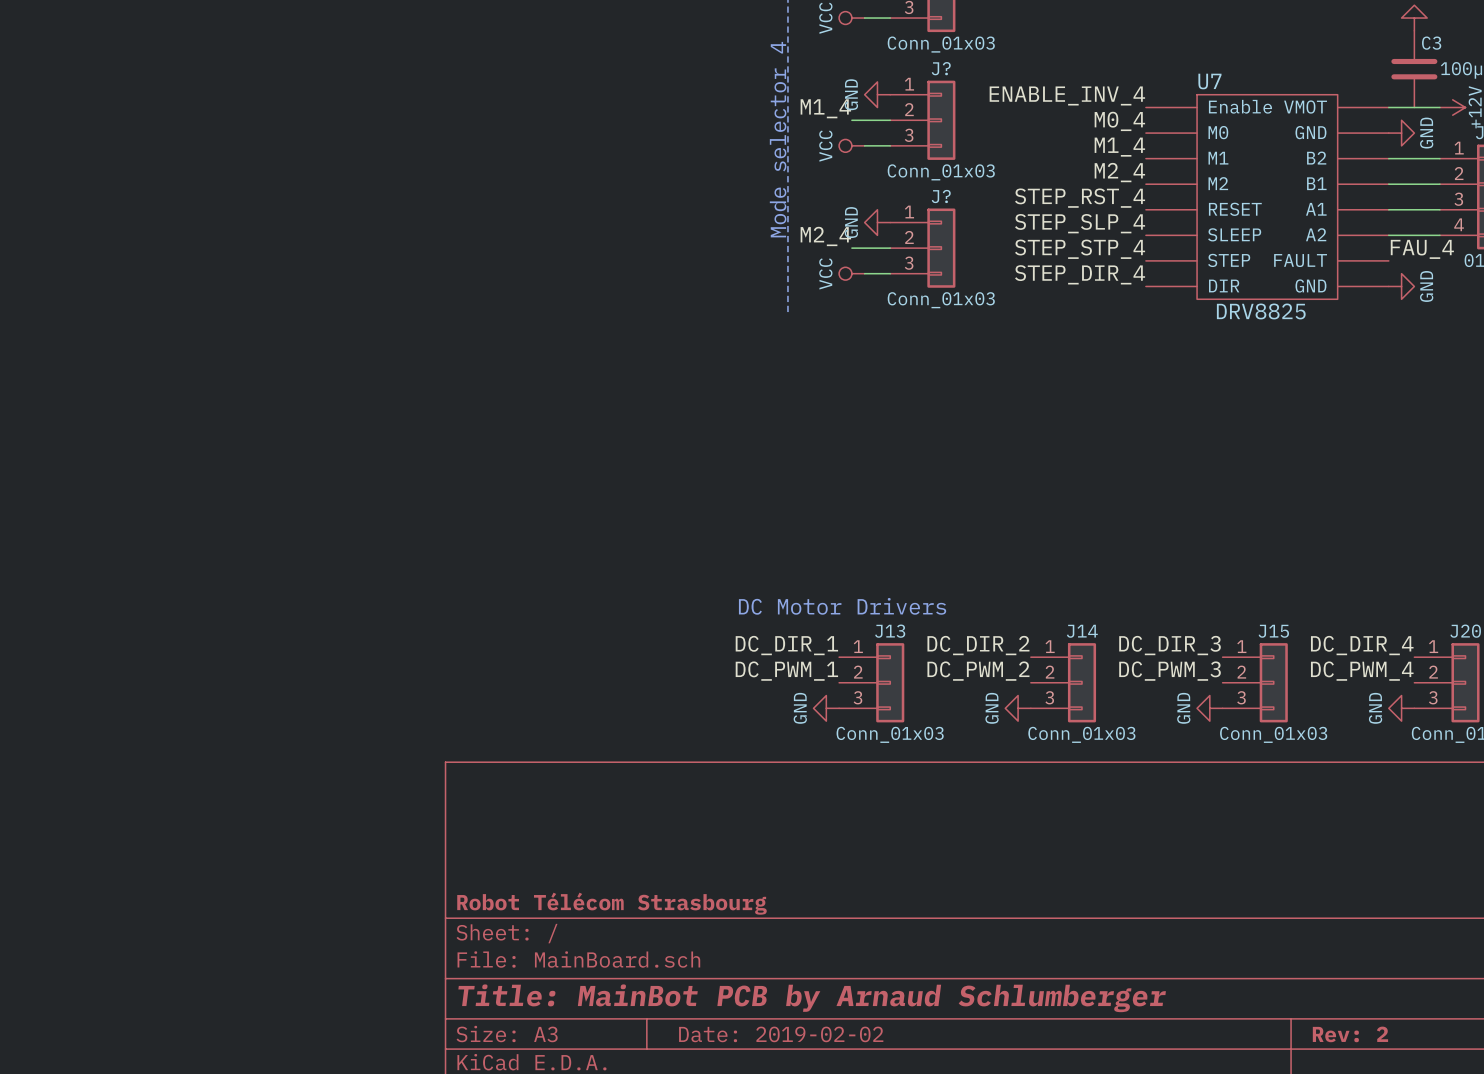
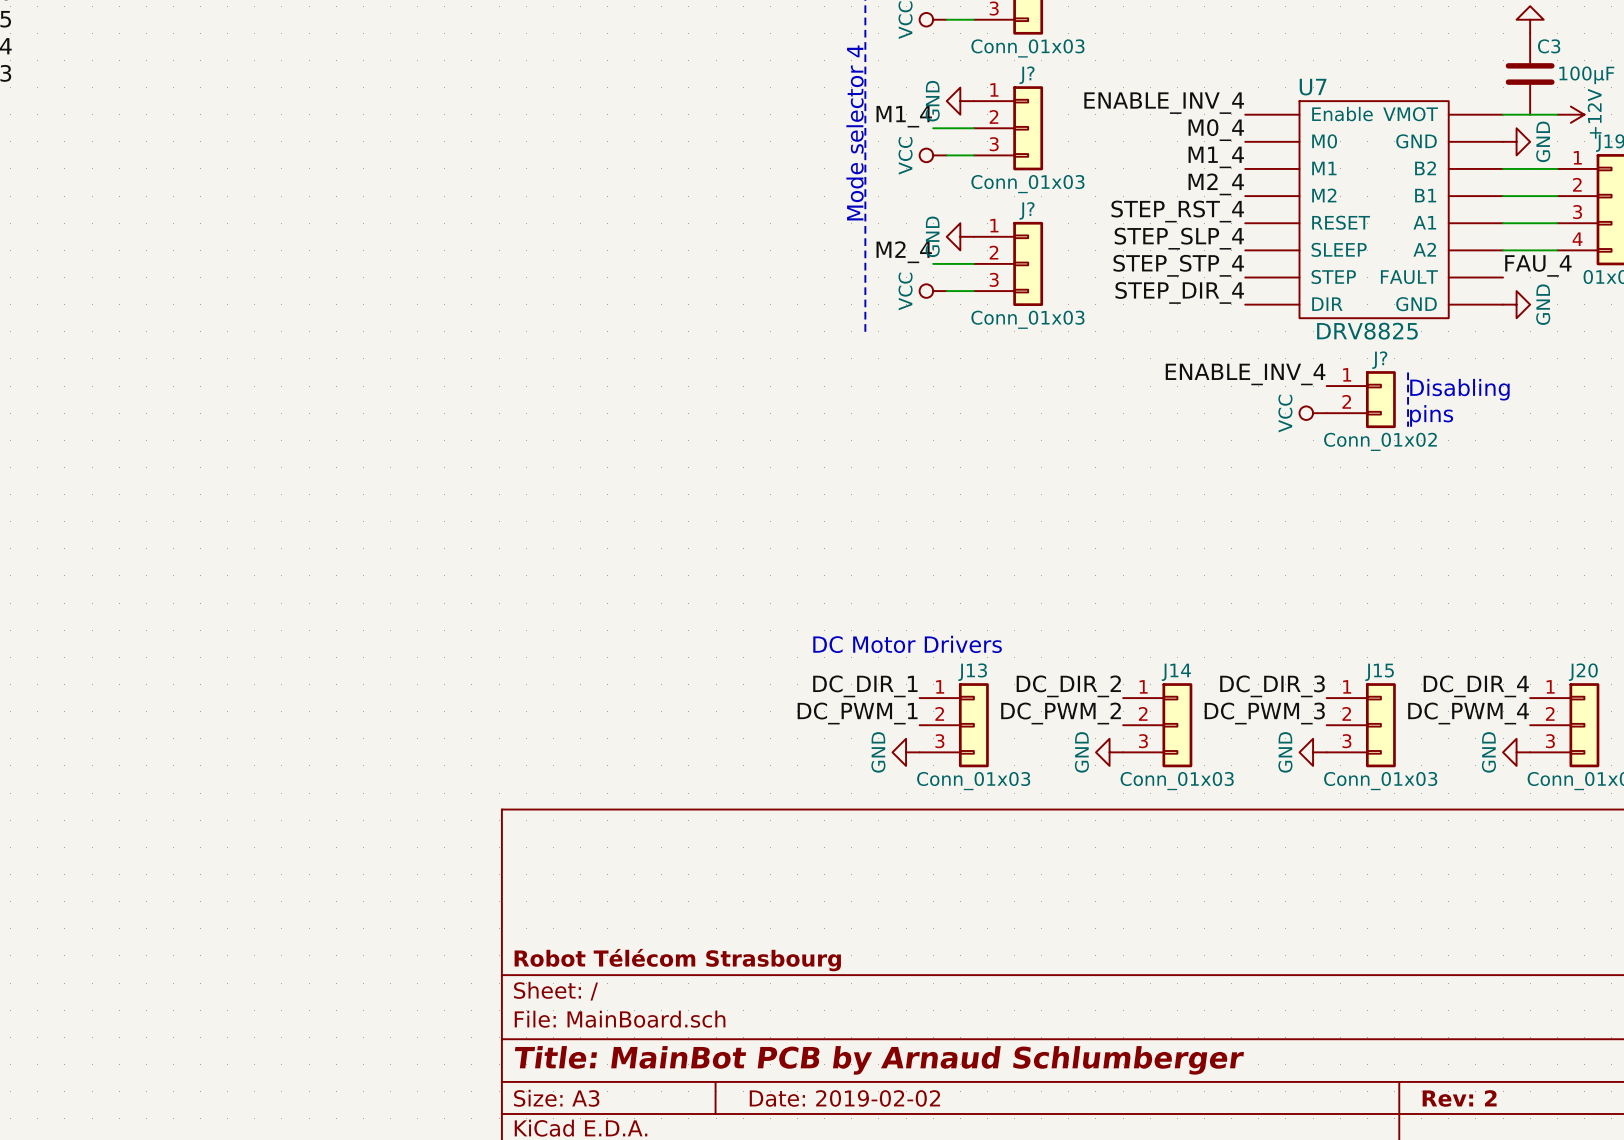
line: none -> (1408, 372) (1408, 426)
label: none -> ENABLE_INV_4 (1245, 374)
text: none -> Disabling (1459, 389)
J?: none -> Conn_01x02 (1361, 399)
power symbol: none -> VCC (1313, 413)
text: none -> pins (1431, 415)

